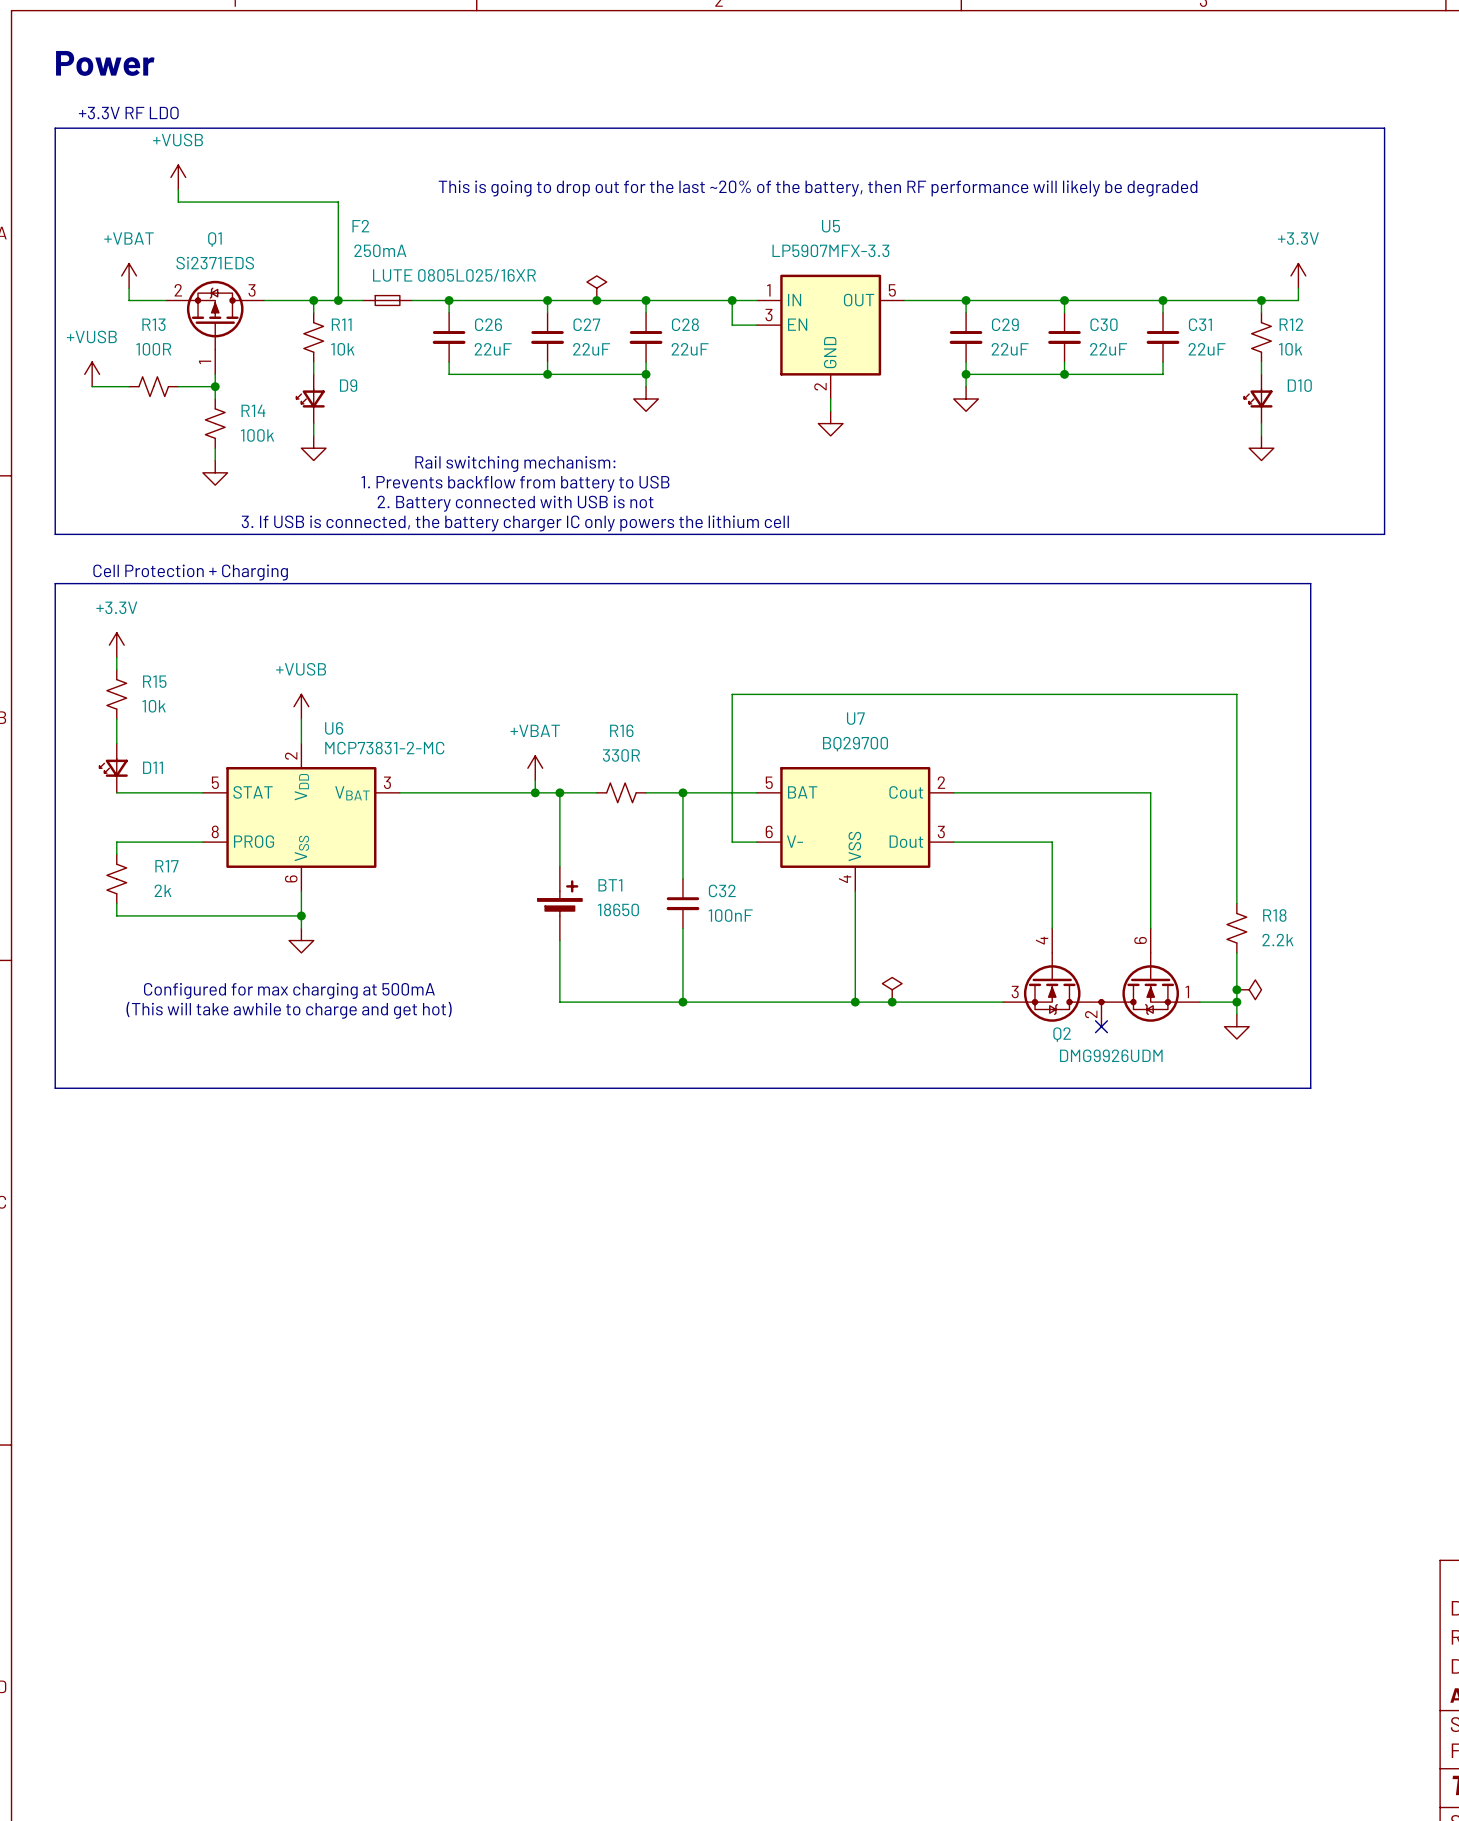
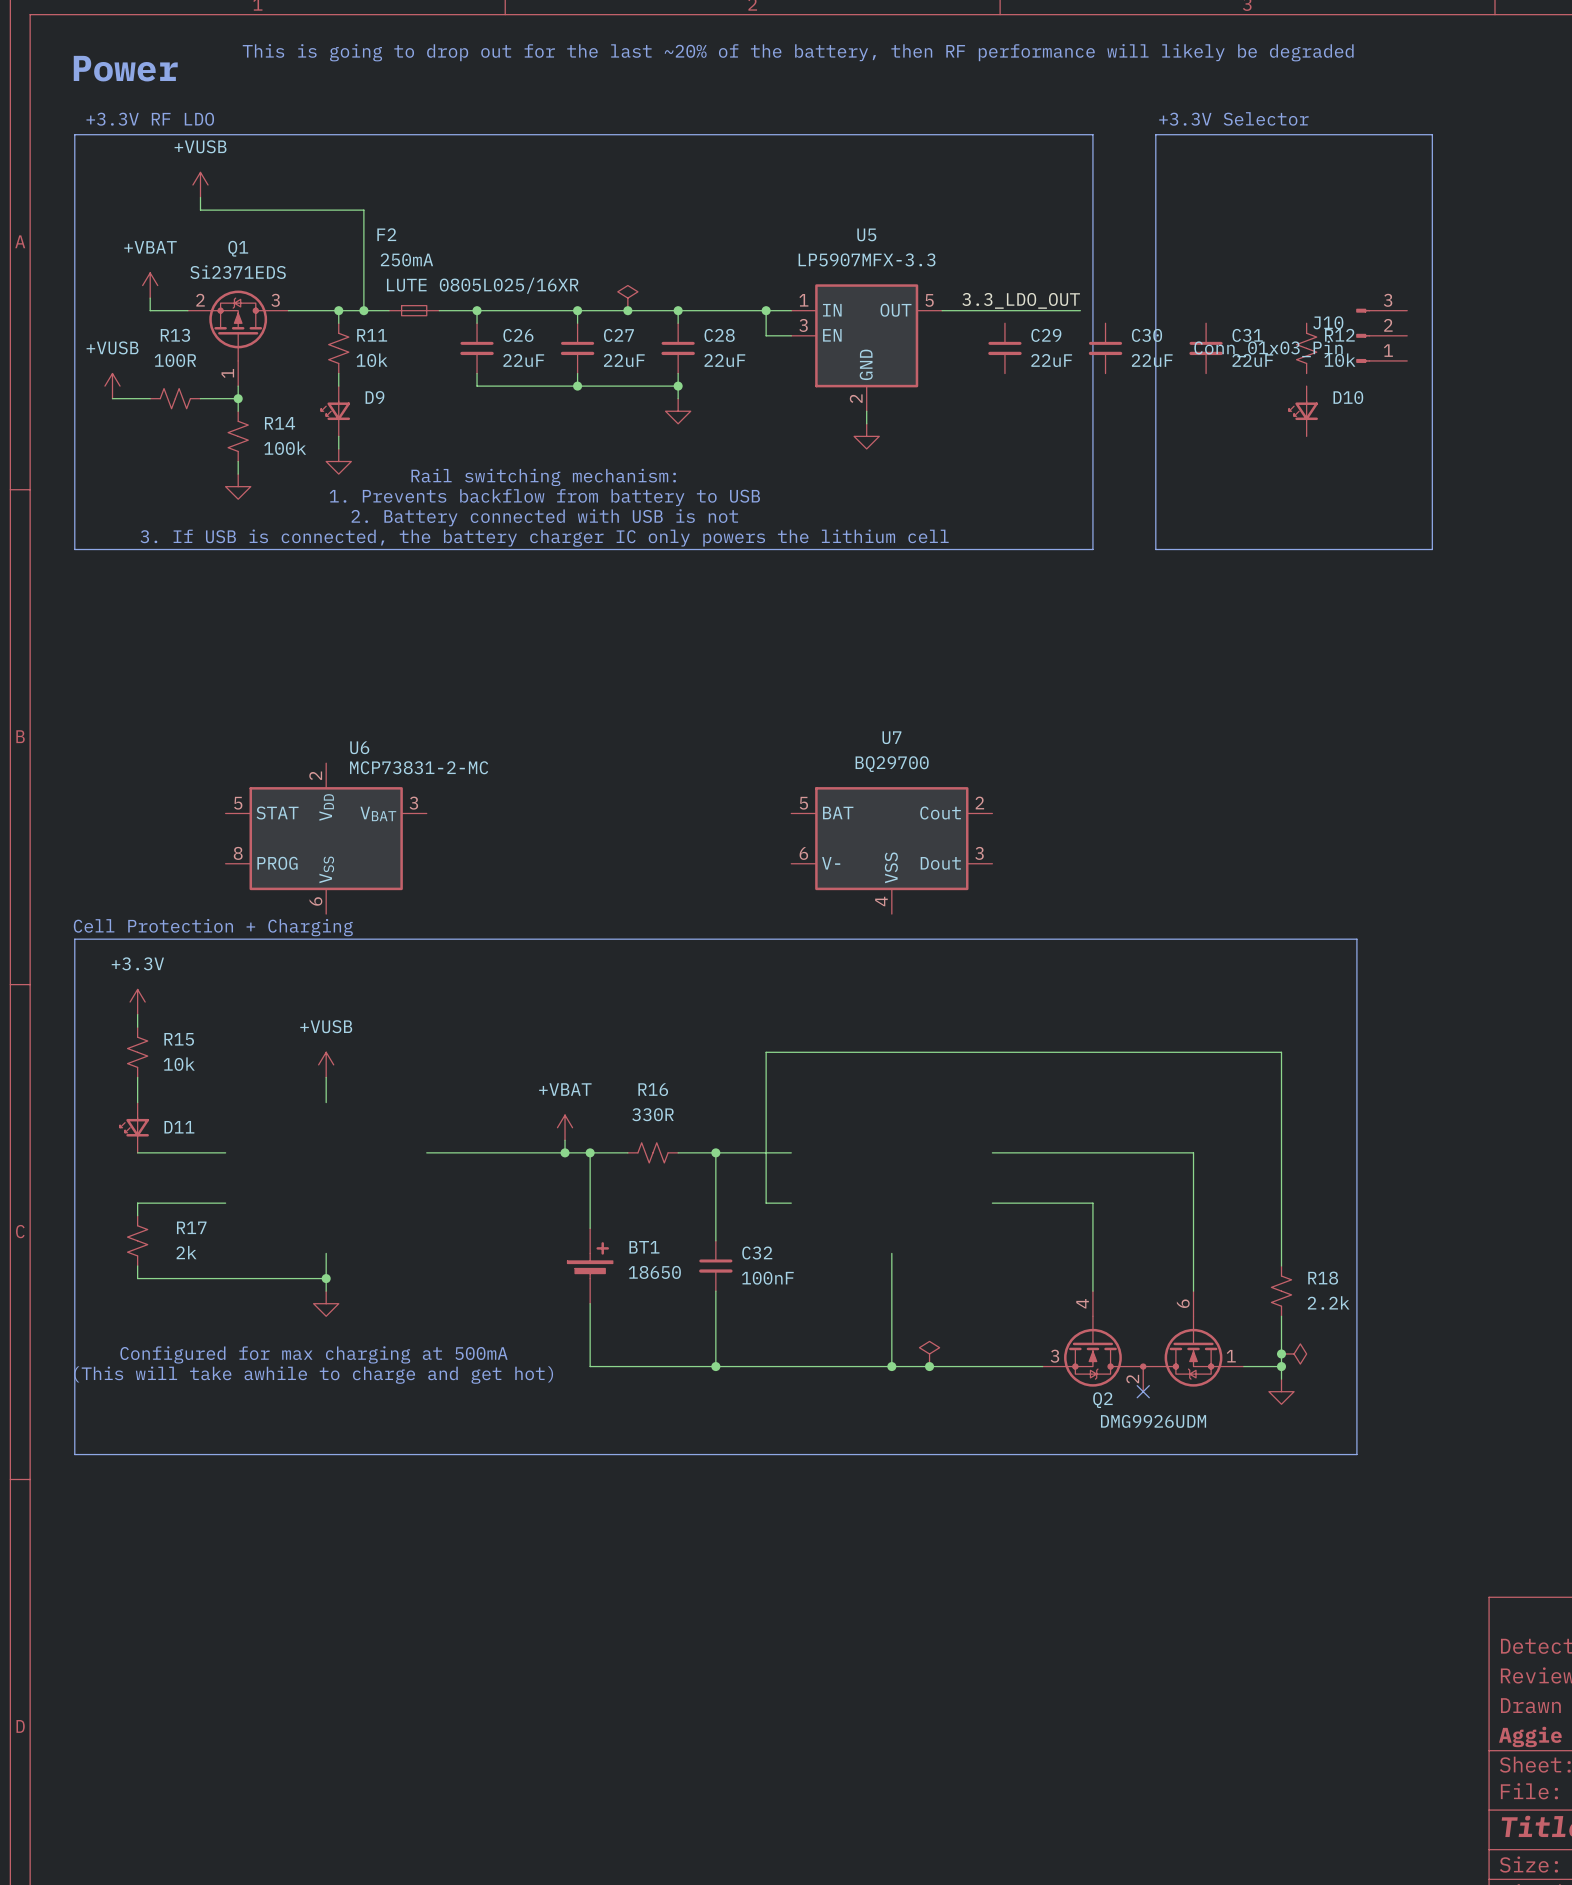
text: none -> +3.3V Selector (1233, 118)
line: (1052, 128) (1113, 128) -> (1092, 134) (1092, 549)
text position: This is going to drop out for the last ~20% of the battery, then RF performance will likely be degraded (818, 188) -> This is going to drop out for the last ~20% of the battery, then RF performance will likely be degraded (798, 52)
power symbol: +3.3V (1298, 275) -> none
wire: (1298, 288) (1298, 300) (1039, 300) -> none
label: none -> 3.3_LDO_OUT (1021, 300)
wire: (966, 300) (966, 312) -> none
junction: (966, 300) -> none
wire: (1064, 300) (1064, 312) -> none
junction: (1064, 300) -> none
wire: (1163, 300) (1163, 312) -> none
junction: (1163, 300) -> none
wire: (1261, 300) (1261, 312) -> none
junction: (1261, 300) -> none
J10: none -> Conn_01x03_Pin (1381, 335)
wire: (966, 362) (966, 386) -> none
wire: (1064, 362) (1064, 374) -> none
wire: (1163, 362) (1163, 374) (966, 374) -> none
wire: (1261, 362) (1261, 374) -> none
junction: (966, 374) -> none
junction: (1064, 374) -> none
power symbol: (966, 398) -> none
wire: (1261, 423) (1261, 435) -> none
power symbol: (1261, 448) -> none
line: (1052, 534) (1113, 534) -> (1155, 134) (1155, 549)
text: Cell Protection + Charging (190, 572) -> none
power symbol: +3.3V (116, 645) -> none
wire: (116, 657) (116, 669) -> none
R15 position: (116, 694) -> (137, 1052)
power symbol: +VUSB (301, 706) -> none
wire: (116, 719) (116, 743) -> none
wire: (301, 719) (301, 743) -> none
D11 position: (113, 768) -> (134, 1127)
power symbol: +VBAT (535, 768) -> none
wire: (535, 780) (535, 792) -> none
wire: (116, 792) (202, 792) -> none
wire: (399, 792) (596, 792) -> none
junction: (535, 792) -> none
wire: (559, 792) (559, 866) -> none
junction: (559, 792) -> none
R16 position: (621, 792) -> (653, 1152)
wire: (646, 792) (756, 792) -> none
wire: (682, 792) (682, 879) -> none
junction: (682, 792) -> none
wire: (953, 792) (1150, 792) (1150, 928) -> none
wire: (202, 842) (116, 842) (116, 854) -> none
wire: (756, 842) (732, 842) (732, 694) (1236, 694) (1236, 903) -> none
wire: (953, 842) (1052, 842) (1052, 928) -> none
R17 position: (116, 879) -> (137, 1240)
wire: (301, 891) (301, 928) -> none
wire: (855, 891) (855, 1002) -> none
BT1 position: (559, 903) -> (590, 1266)
C32 position: (682, 903) -> (715, 1266)
text: none -> Cell Protection + Charging (213, 927)
line: (55, 915) (55, 583) (1310, 583) (1310, 915) -> (74, 939) (1356, 939)
junction: (301, 915) -> none
wire: (682, 928) (682, 1002) -> (590, 1152) (590, 1228)
R18 position: (1236, 928) -> (1281, 1291)
power symbol: (301, 940) -> none
wire: (559, 940) (559, 1002) (1003, 1002) -> none
wire: (1236, 952) (1236, 1014) -> none
power symbol: none -> +3.3V (137, 1002)
Q2 position: (1101, 977) -> (1143, 1341)
wire: none -> (137, 1014) (137, 1027)
power symbol: (892, 989) -> none
junction: (1236, 989) -> none
power symbol: (1249, 989) -> none
text: Configured for max charging at 500mA (289, 990) -> none
junction: (682, 1002) -> none
junction: (855, 1002) -> none
junction: (892, 1002) -> none
wire: (1199, 1002) (1236, 1002) -> none
junction: (1236, 1002) -> none
text: (This will take awhile to charge and get hot) (289, 1010) -> none
no-connect mark: (1101, 1026) -> none
power symbol: (1236, 1026) -> none
power symbol: none -> +VUSB (326, 1064)
wire: none -> (137, 1077) (137, 1102)
wire: none -> (326, 1077) (326, 1102)
line: (55, 1088) (1310, 1088) -> (74, 1115) (74, 1454) (1356, 1454) (1356, 1115)
power symbol: none -> +VBAT (565, 1127)
wire: none -> (565, 1140) (565, 1152)
wire: none -> (137, 1152) (225, 1152)
wire: none -> (426, 1152) (627, 1152)
junction: none -> (565, 1152)
junction: none -> (590, 1152)
wire: none -> (678, 1152) (791, 1152)
wire: none -> (715, 1152) (715, 1240)
junction: none -> (715, 1152)
wire: none -> (992, 1152) (1193, 1152) (1193, 1291)
wire: none -> (225, 1203) (137, 1203) (137, 1215)
wire: none -> (791, 1203) (766, 1203) (766, 1052) (1281, 1052) (1281, 1266)
wire: none -> (992, 1203) (1092, 1203) (1092, 1291)
wire: none -> (326, 1253) (326, 1291)
wire: none -> (891, 1253) (891, 1366)
wire: none -> (137, 1266) (137, 1278) (326, 1278)
junction: none -> (326, 1278)
wire: none -> (715, 1291) (715, 1366)
power symbol: none -> (326, 1303)
wire: none -> (590, 1303) (590, 1366) (1042, 1366)
wire: none -> (1281, 1316) (1281, 1379)
power symbol: none -> (929, 1353)
junction: none -> (1281, 1353)
power symbol: none -> (1294, 1353)
text: none -> Configured for max charging at 500mA (313, 1354)
junction: none -> (715, 1366)
junction: none -> (891, 1366)
junction: none -> (929, 1366)
wire: none -> (1243, 1366) (1281, 1366)
junction: none -> (1281, 1366)
text: none -> (This will take awhile to charge and get hot) (313, 1375)
no-connect mark: none -> (1143, 1391)
power symbol: none -> (1281, 1391)

